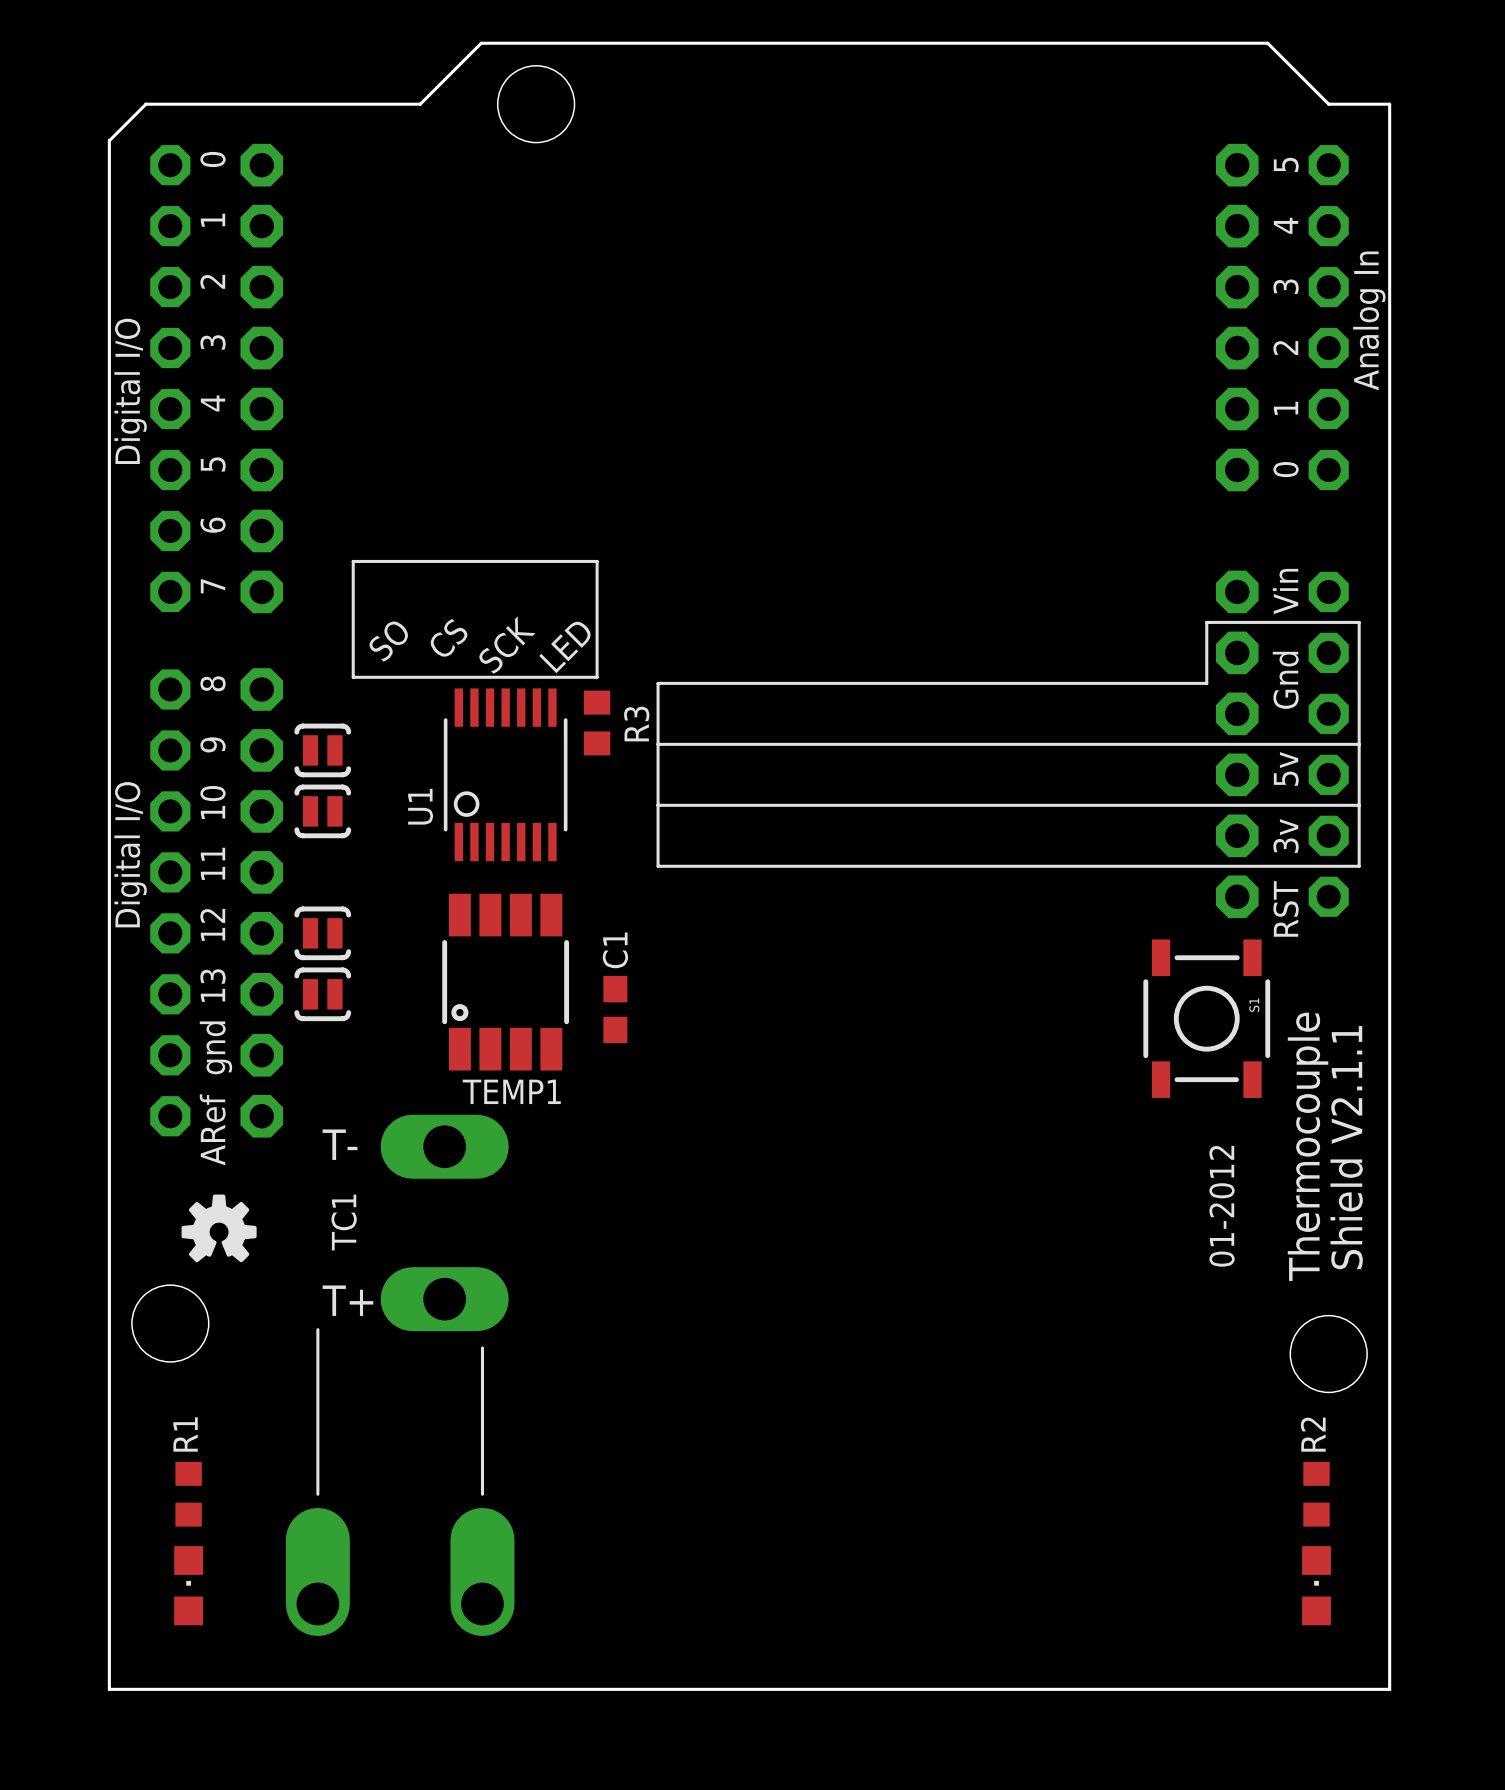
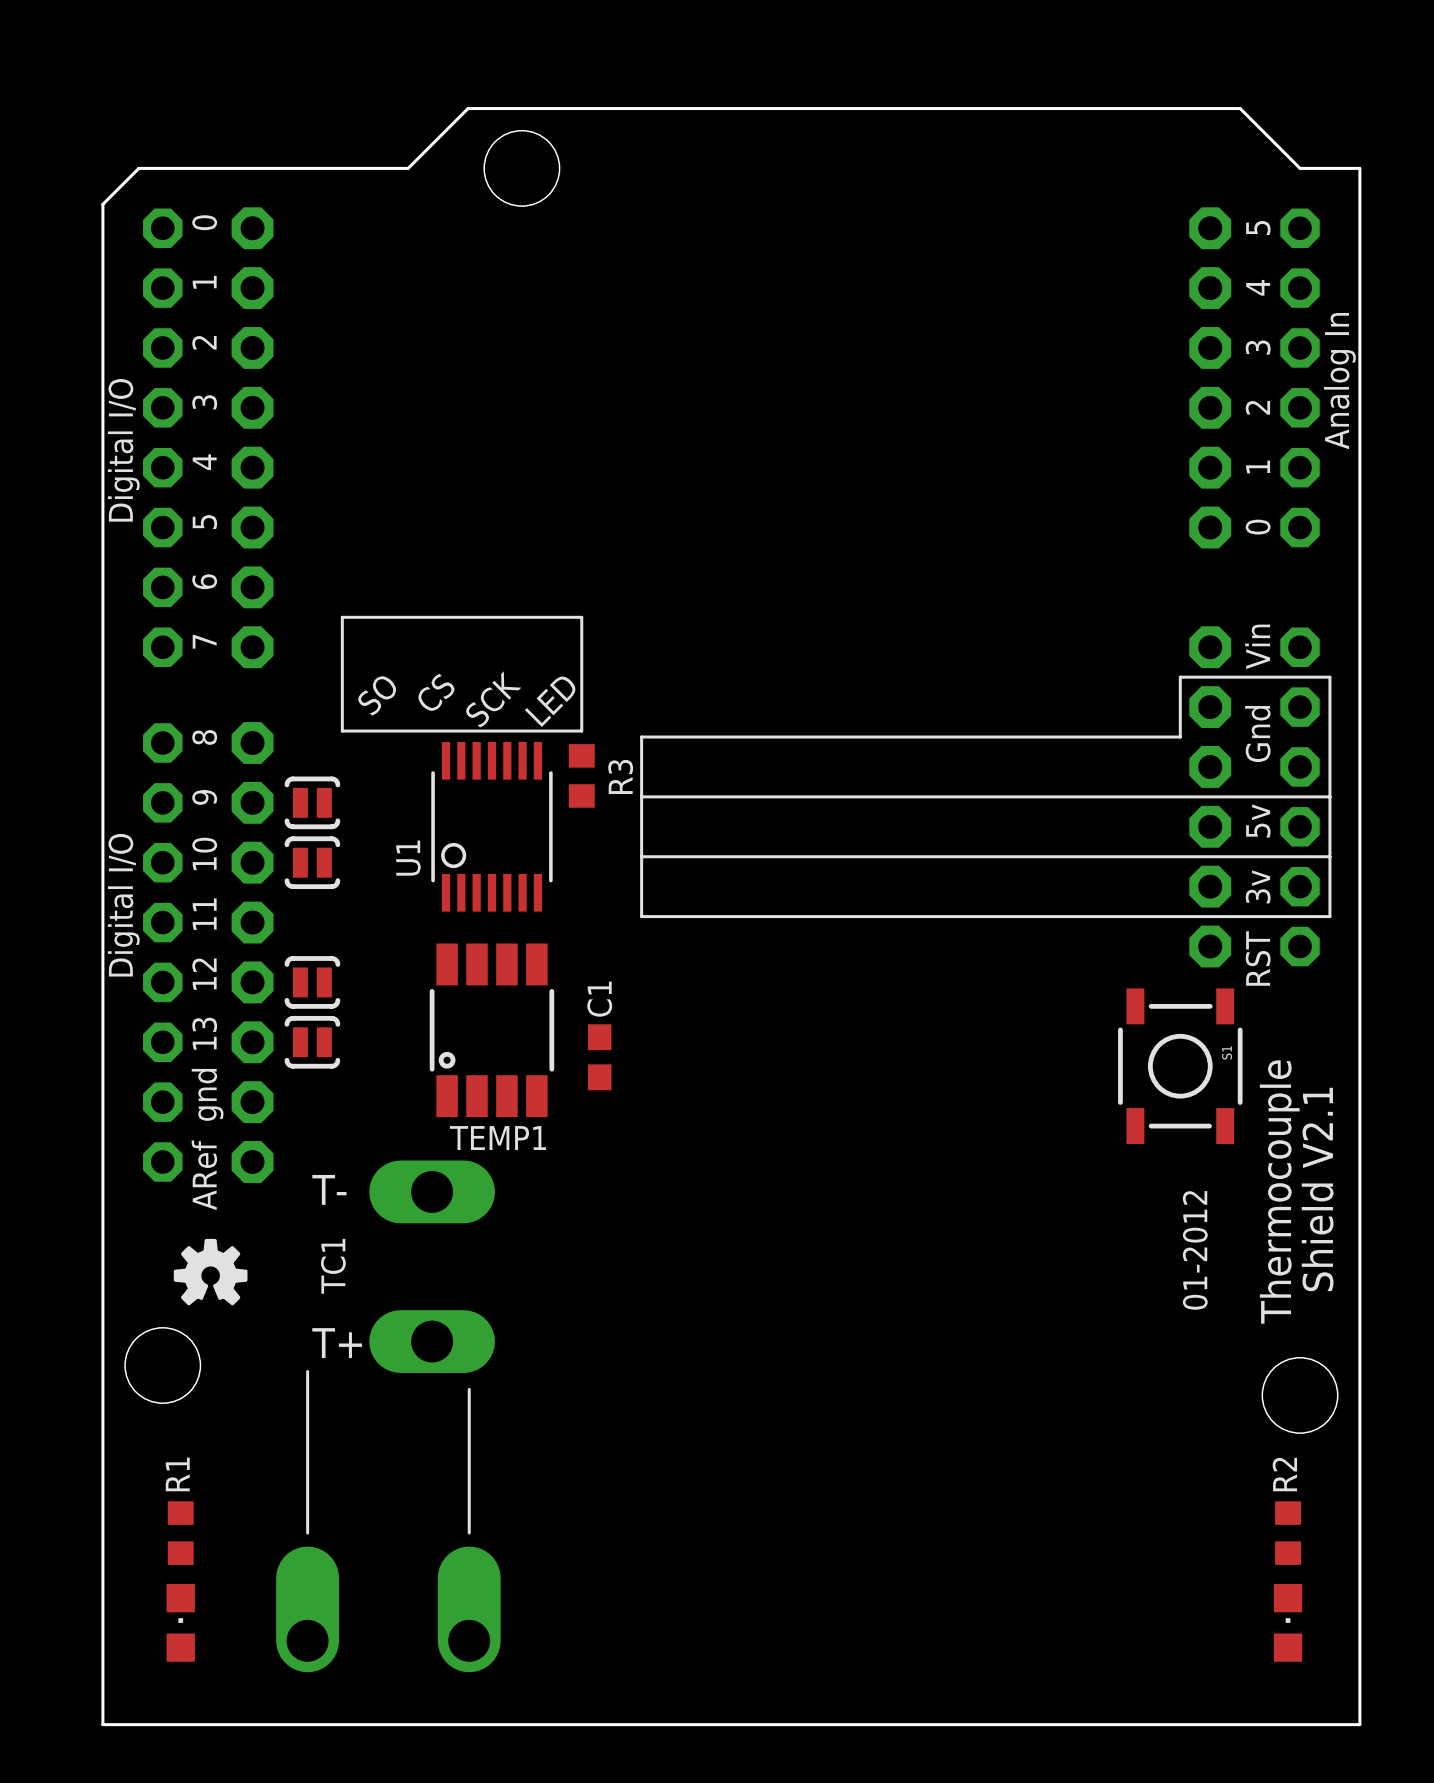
text: Shield V2.1.1 (1346, 1147) -> Shield V2.1 (1317, 1189)

